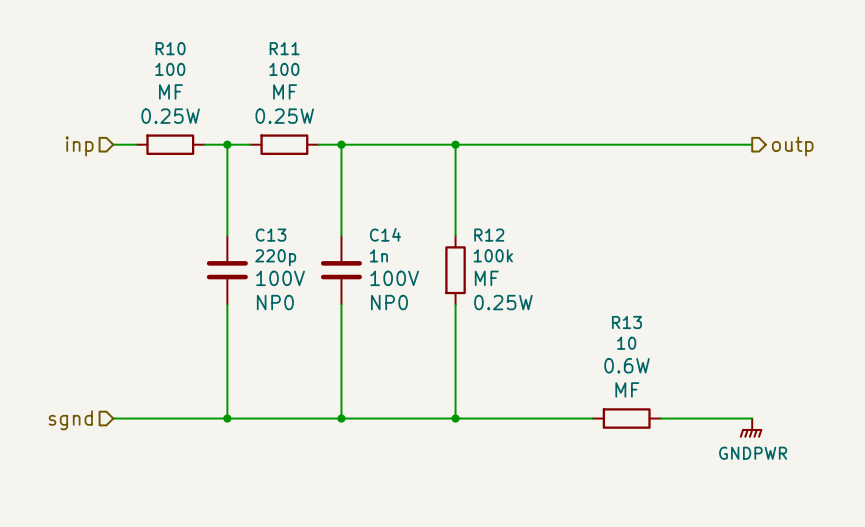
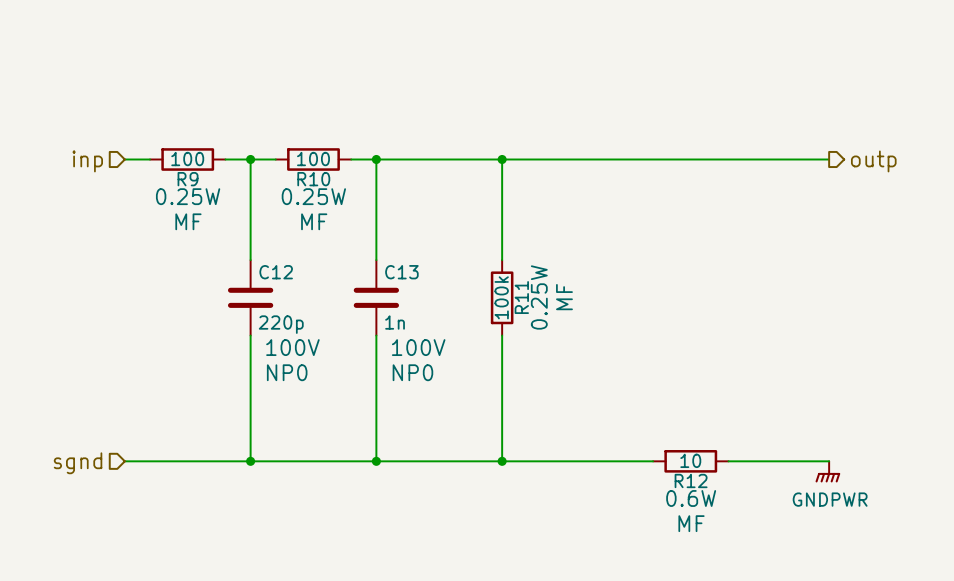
R10 name: R10 (170, 48) -> R9 (188, 179)
R11 name: R11 (284, 48) -> R10 (313, 179)
R10 value position: 100 (170, 69) -> 100 (187, 159)
R11 value position: 100 (284, 69) -> 100 (313, 159)
R10 text position: MF (170, 91) -> MF (188, 221)
R11 text position: MF (285, 91) -> MF (314, 221)
R10 text position: 0.25W (170, 116) -> 0.25W (188, 196)
R11 text position: 0.25W (284, 116) -> 0.25W (313, 196)
C14 name: C14 (385, 234) -> C13 (401, 272)
C13 name: C13 (271, 235) -> C12 (276, 272)
R12 name: R12 (489, 235) -> R11 (521, 297)
C14 value position: 1n (378, 255) -> 1n (395, 322)
R12 value rotation: 0° (493, 255) -> 90° counterclockwise (501, 297)
C13 value position: 220p (275, 257) -> 220p (281, 324)
C13 text position: 100V (280, 278) -> 100V (292, 347)
C14 text position: 100V (394, 278) -> 100V (418, 347)
R12 text rotation: 0° (486, 278) -> 90° counterclockwise (564, 297)
C13 text position: NP0 (275, 302) -> NP0 (287, 372)
C14 text position: NP0 (389, 302) -> NP0 (412, 372)
R12 text rotation: 0° (503, 302) -> 90° counterclockwise (539, 297)
R13 name: R13 (626, 322) -> R12 (691, 480)
R13 value position: 10 (626, 343) -> 10 (690, 460)
R13 text position: 0.6W (627, 365) -> 0.6W (691, 498)
R13 text position: MF (627, 389) -> MF (691, 523)

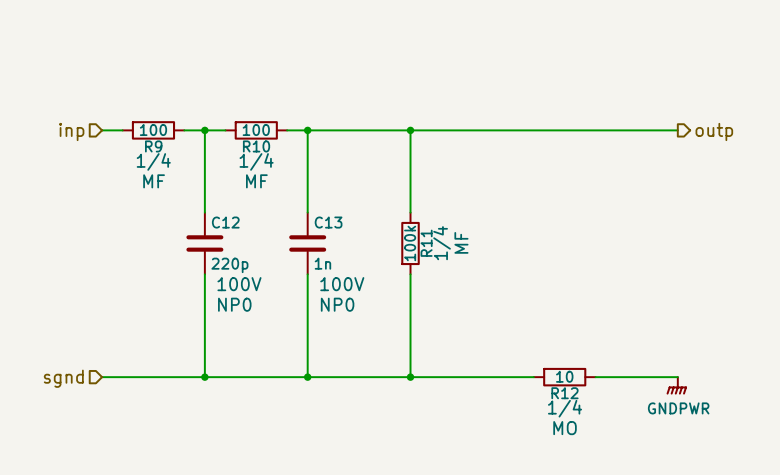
R9 text: 0.25W (188, 196) -> 1/4 (153, 161)
R10 text: 0.25W (313, 196) -> 1/4 (256, 161)
R11 text: 0.25W (539, 297) -> 1/4 (442, 243)
R12 text: 0.6W (691, 498) -> 1/4 (565, 408)
R12 text: MF (691, 523) -> MO (565, 428)

